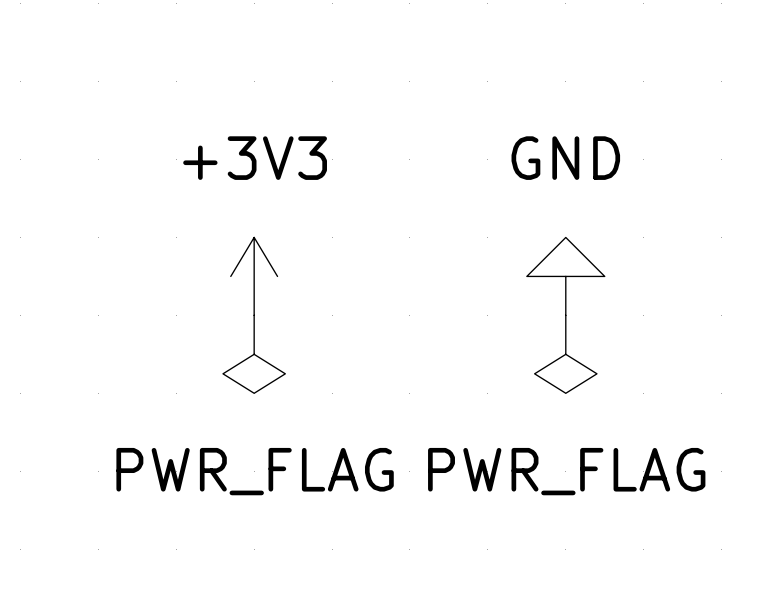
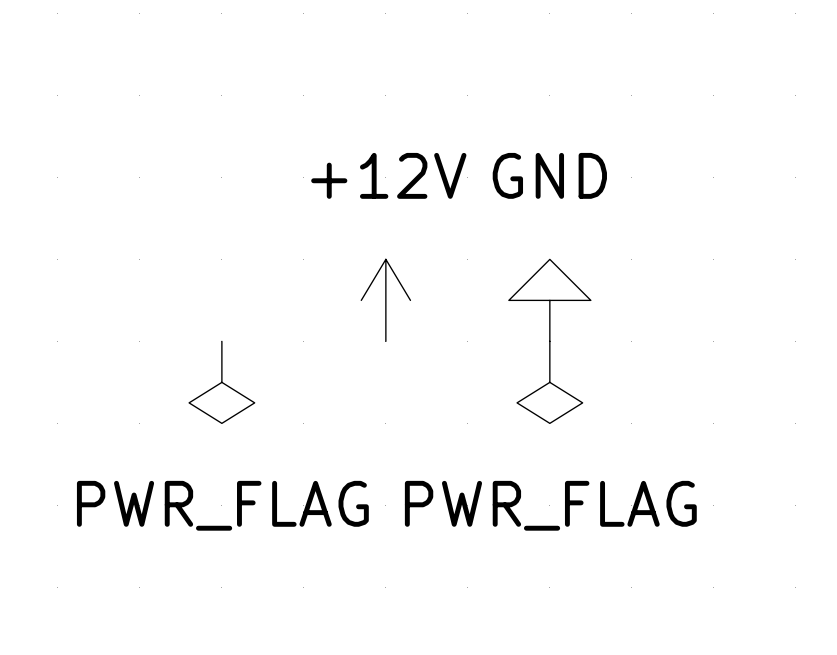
power symbol: +3V3 (254, 276) -> none
power symbol: none -> +12V (385, 300)

